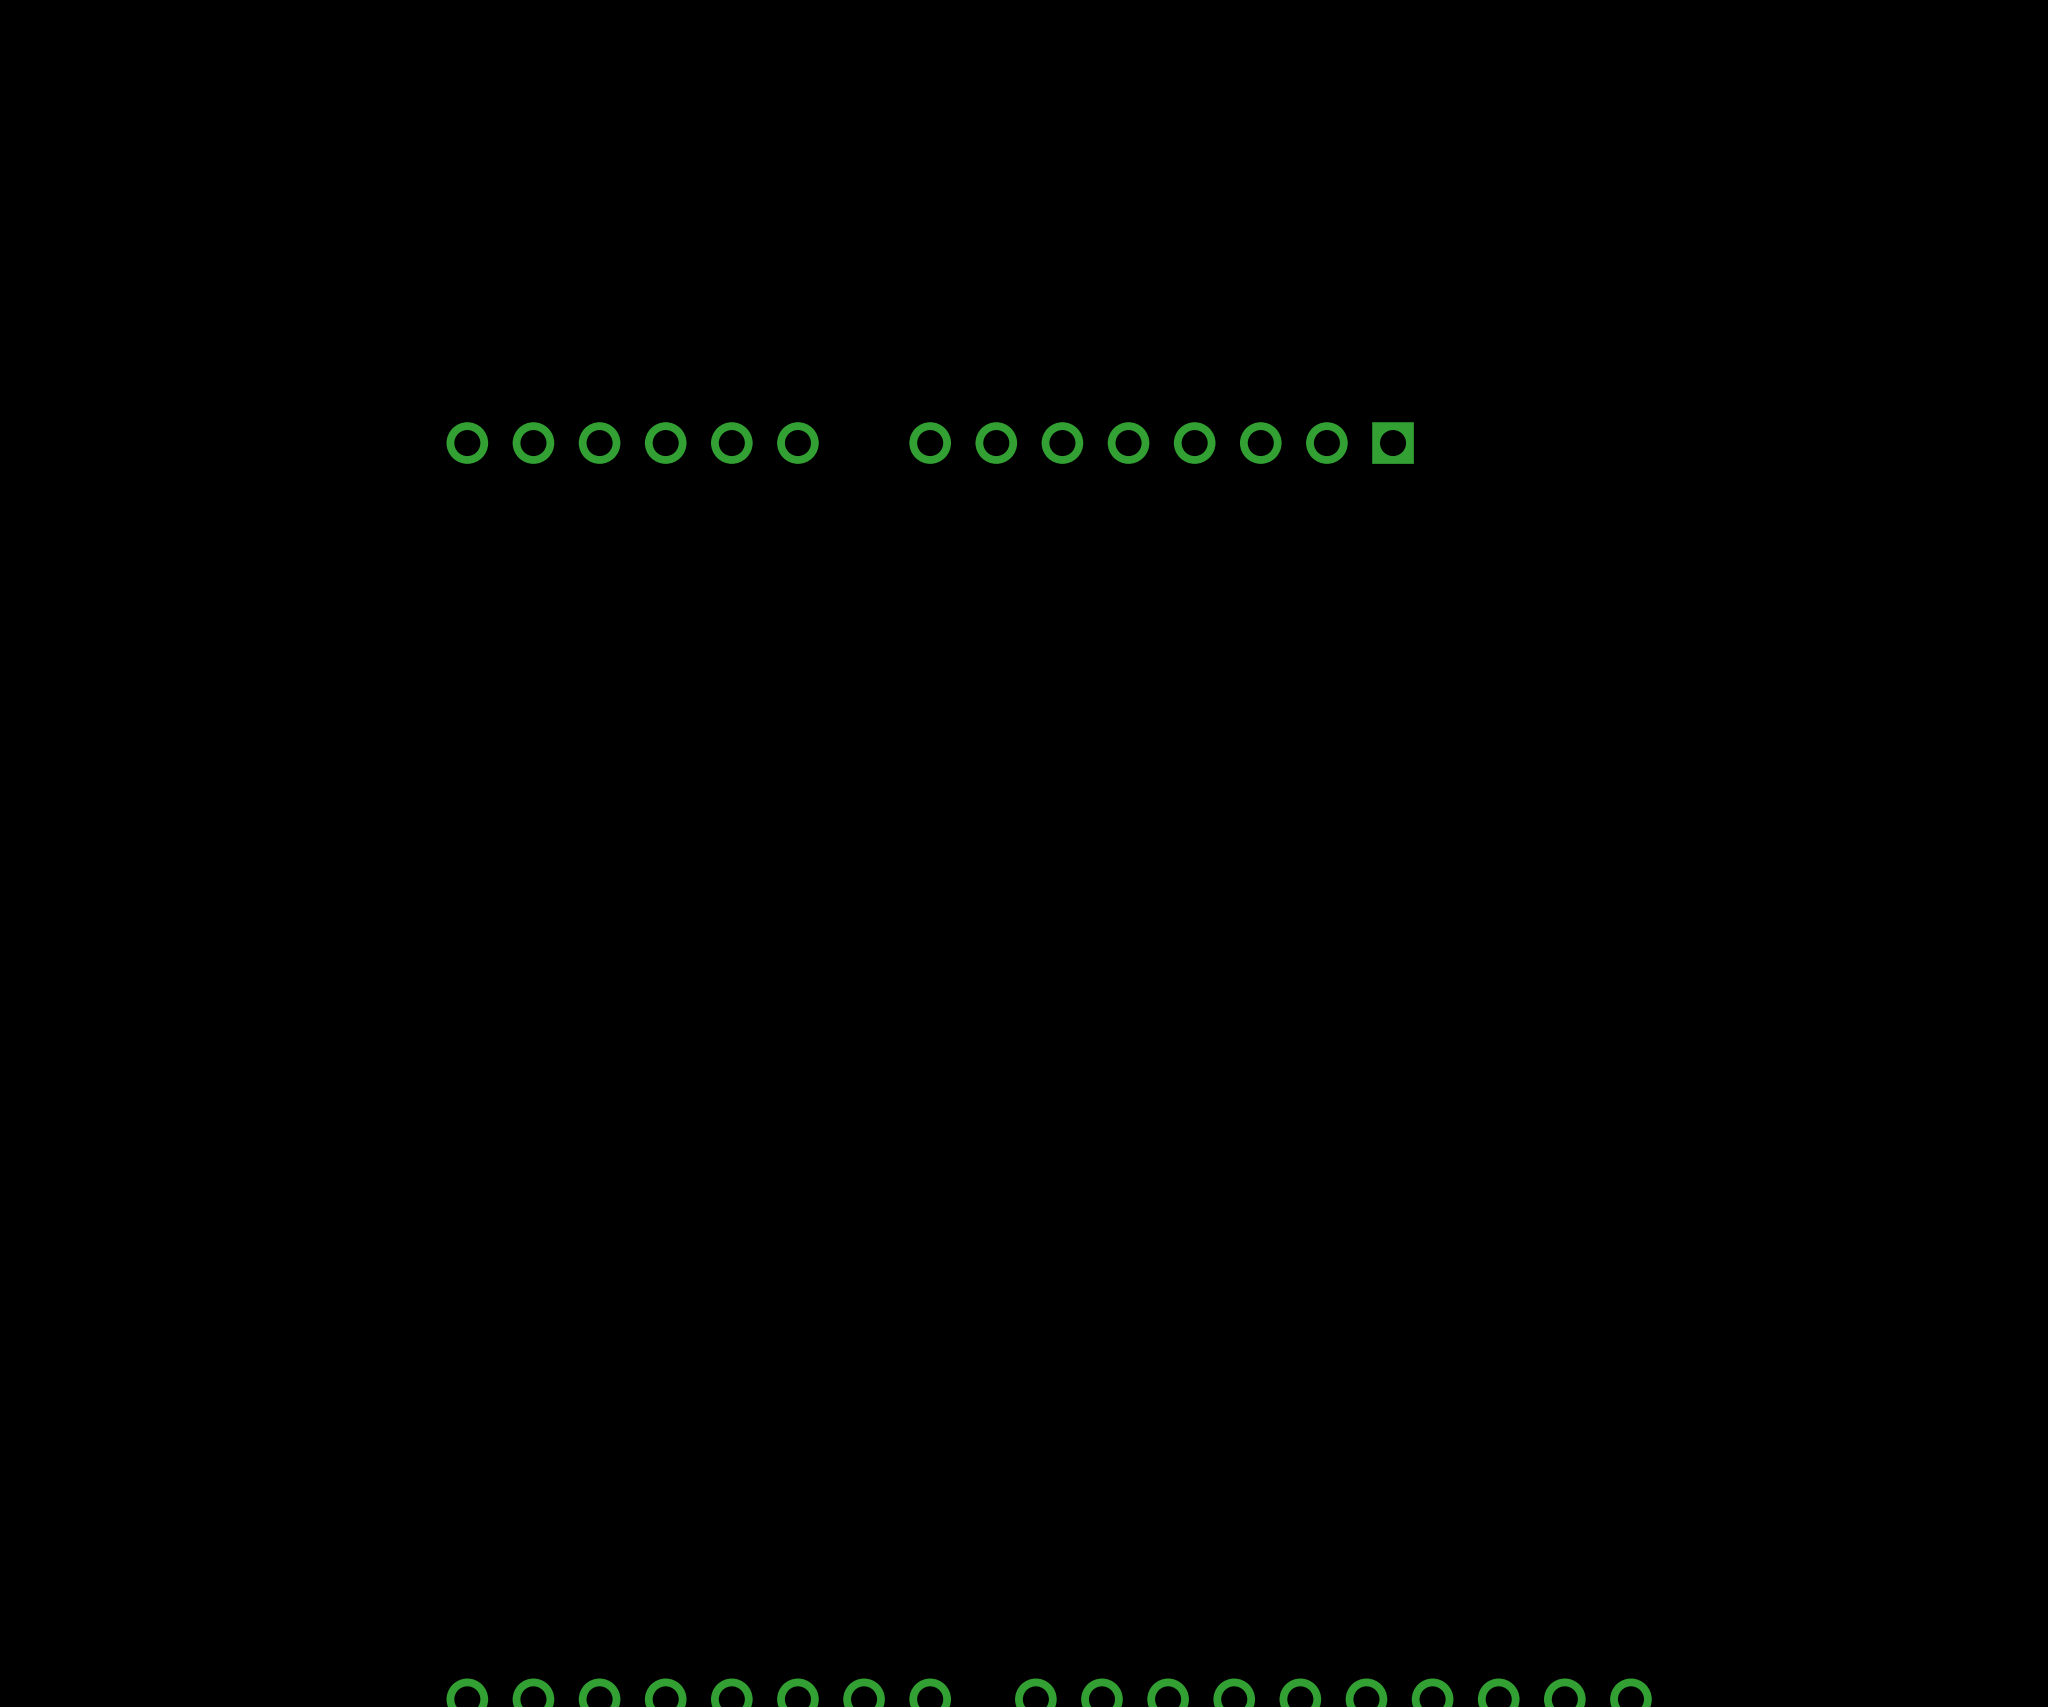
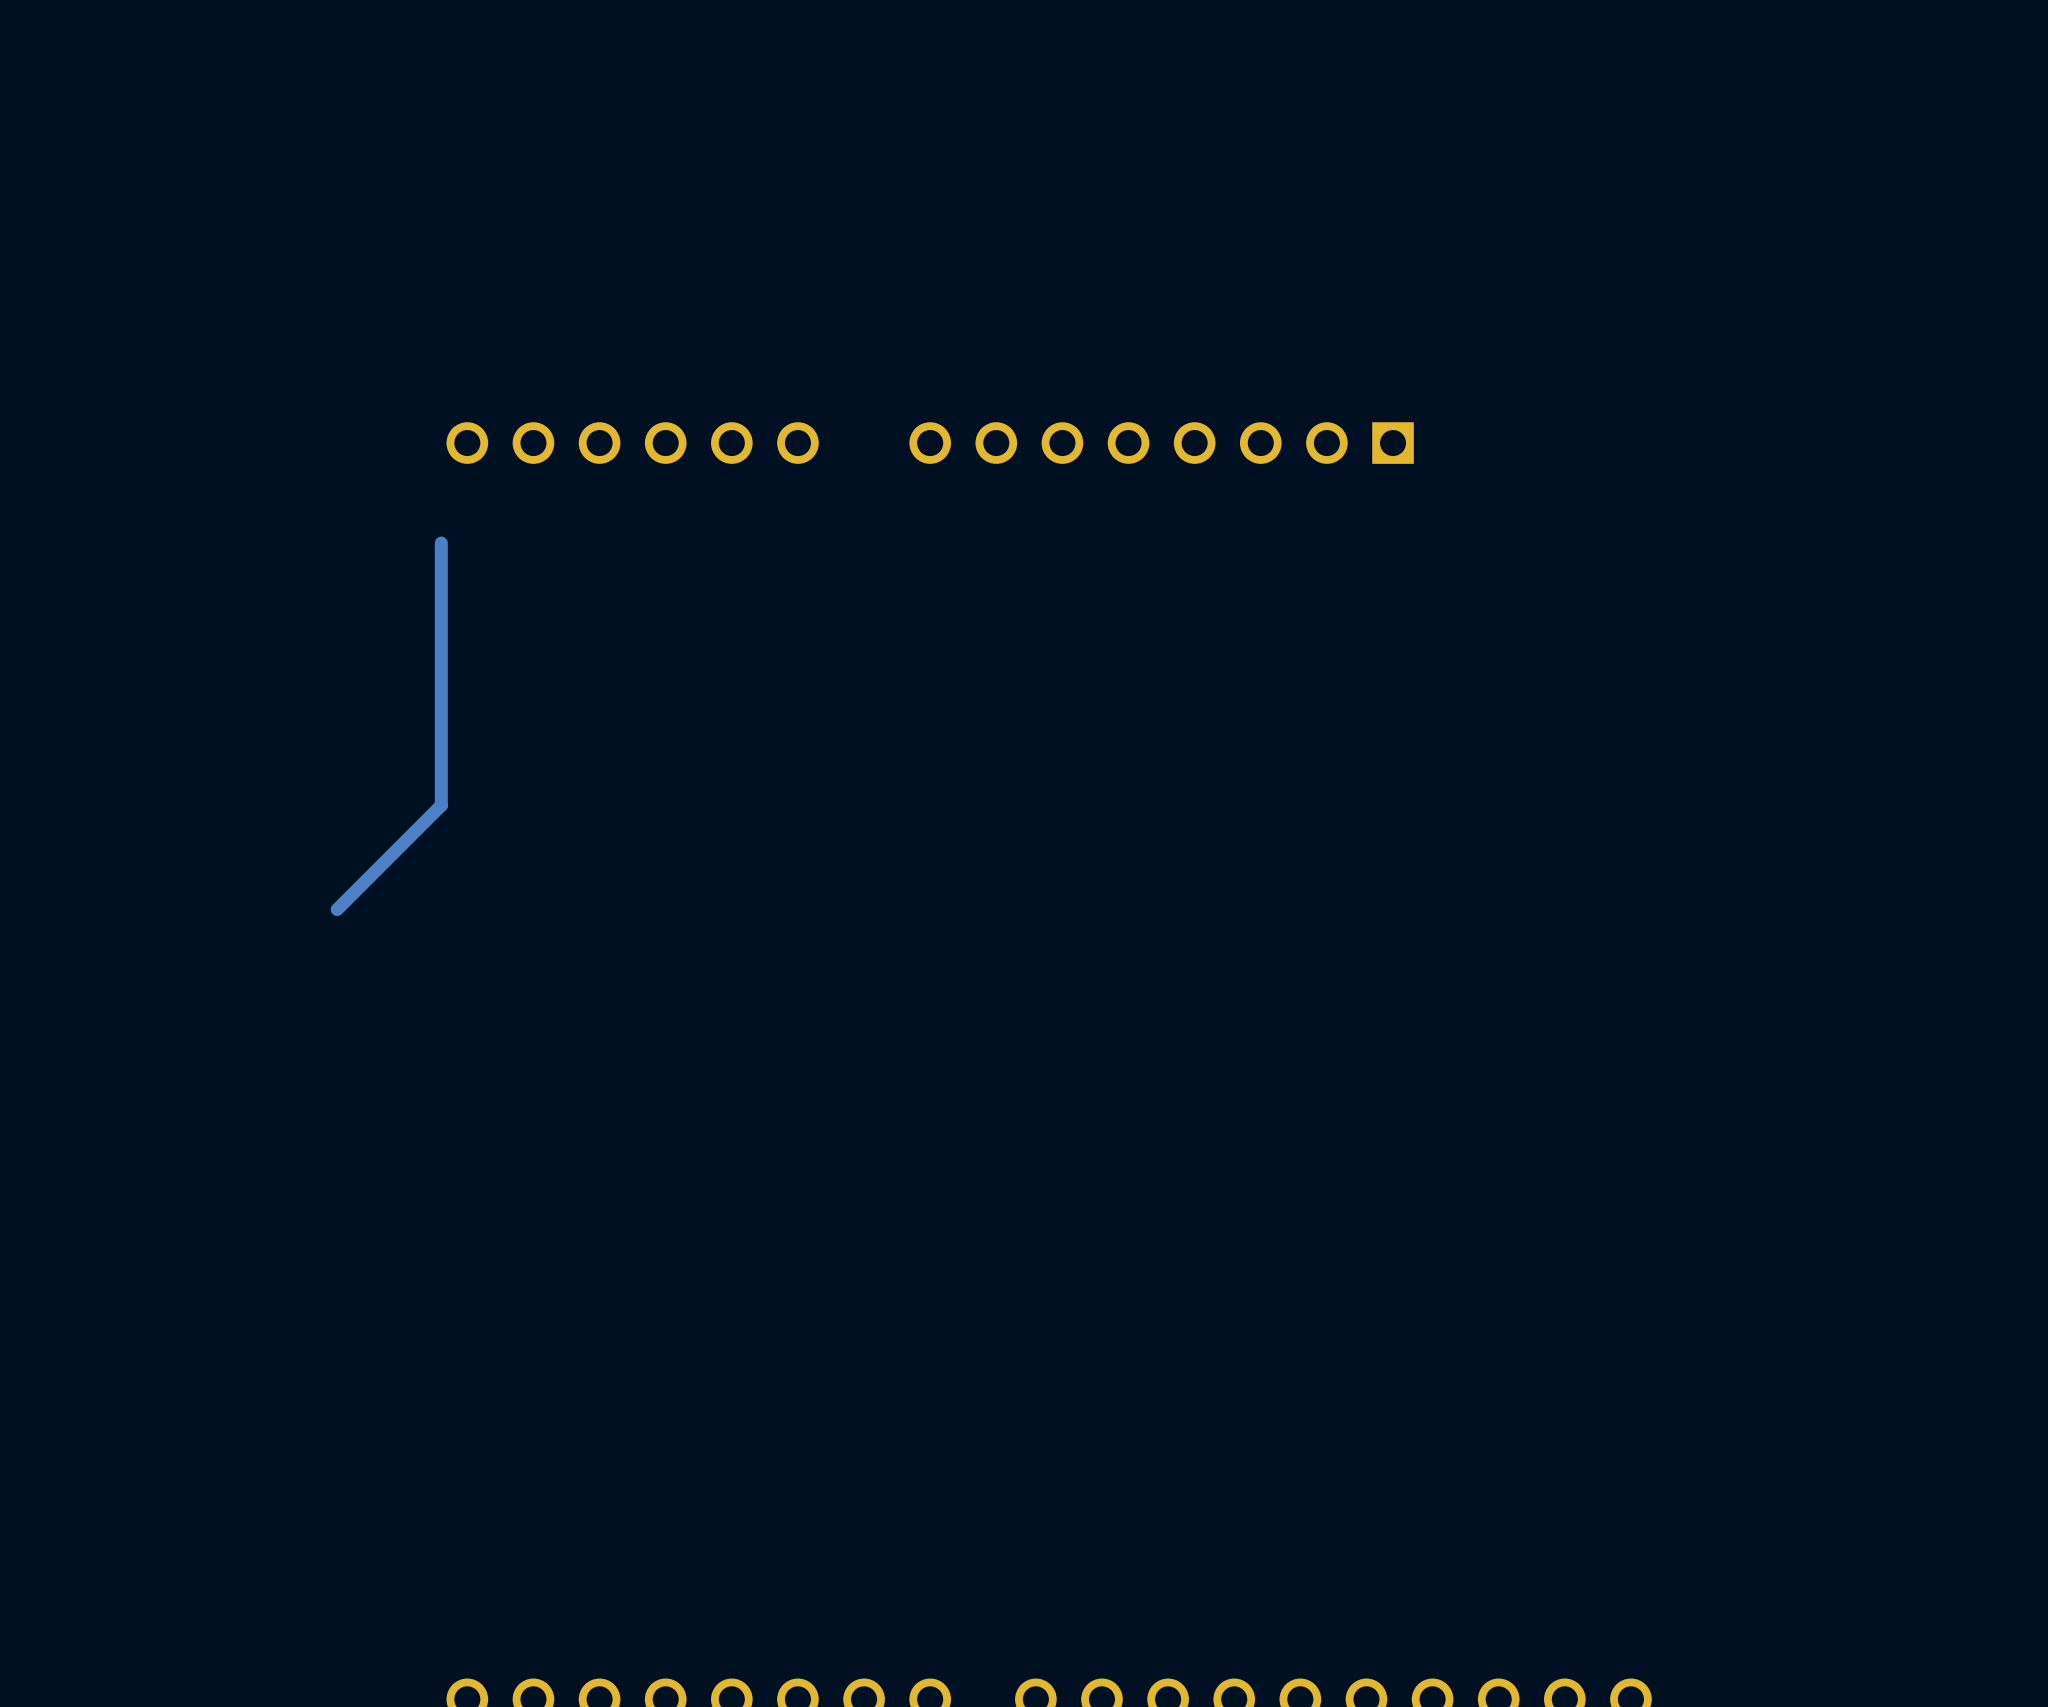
track: none -> (441, 543) (441, 805) (337, 909)

